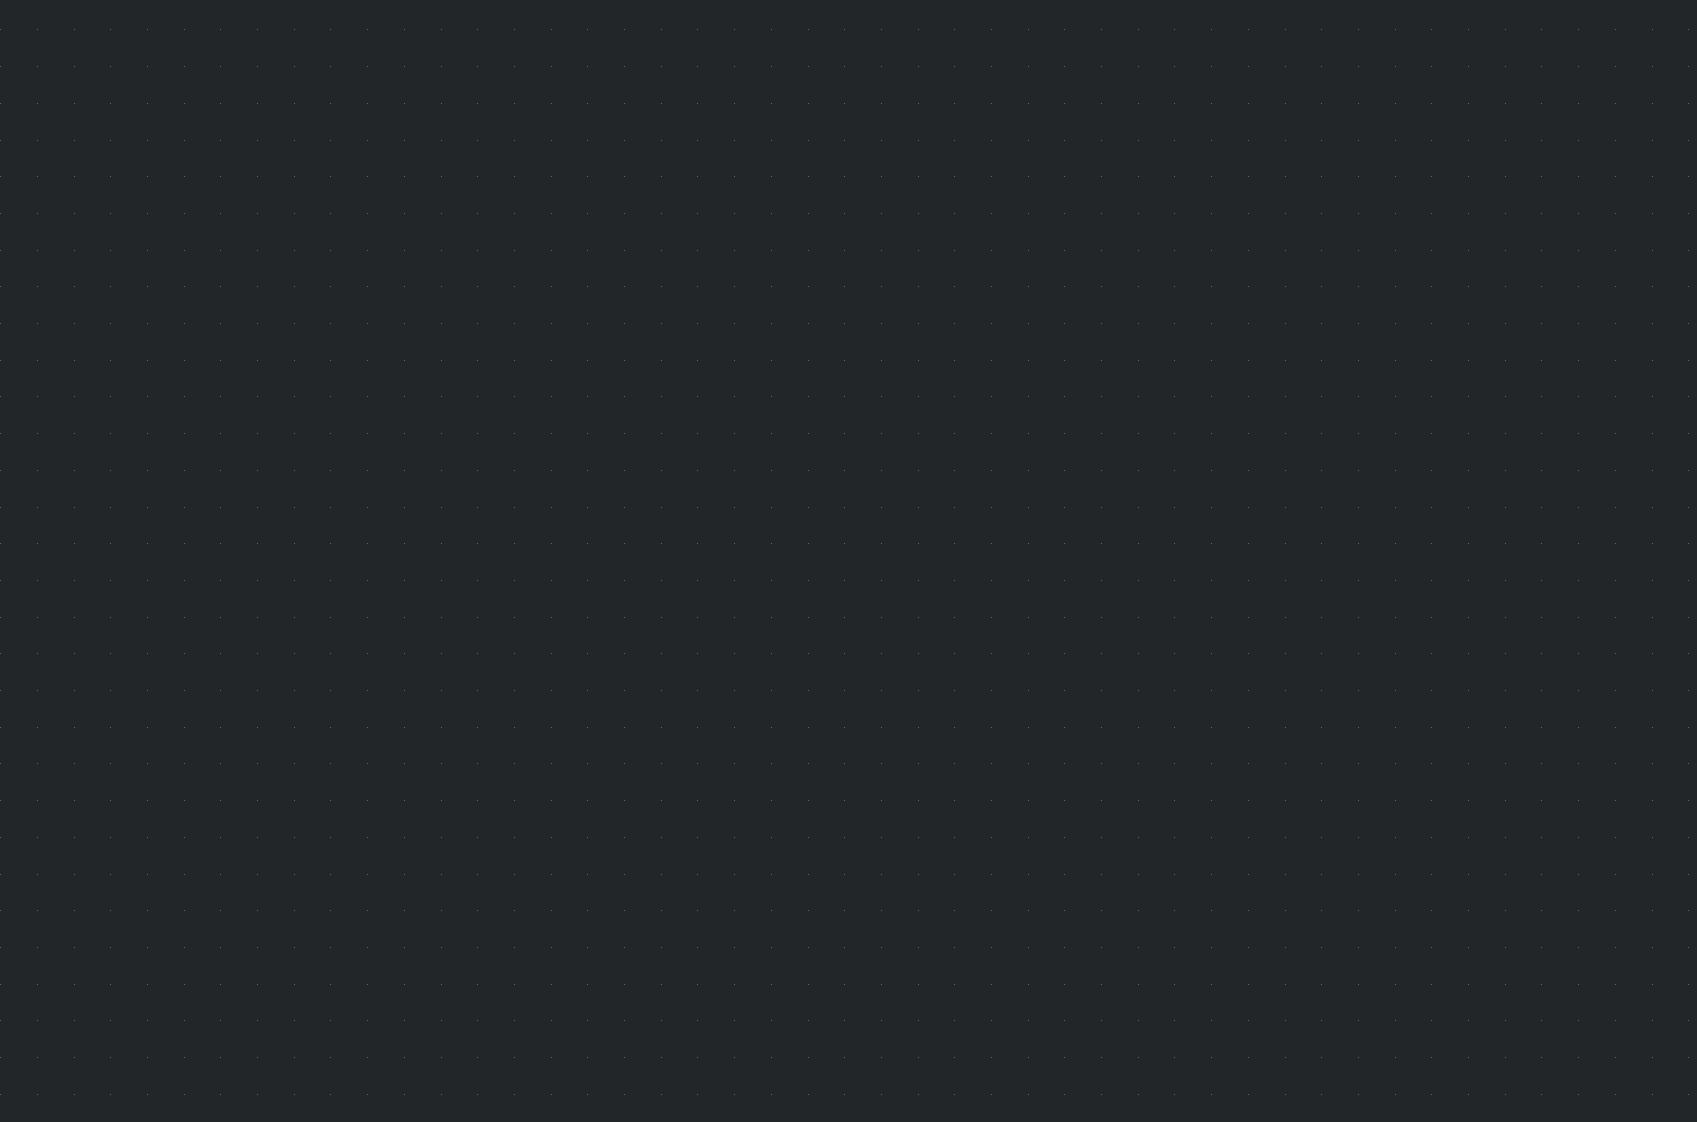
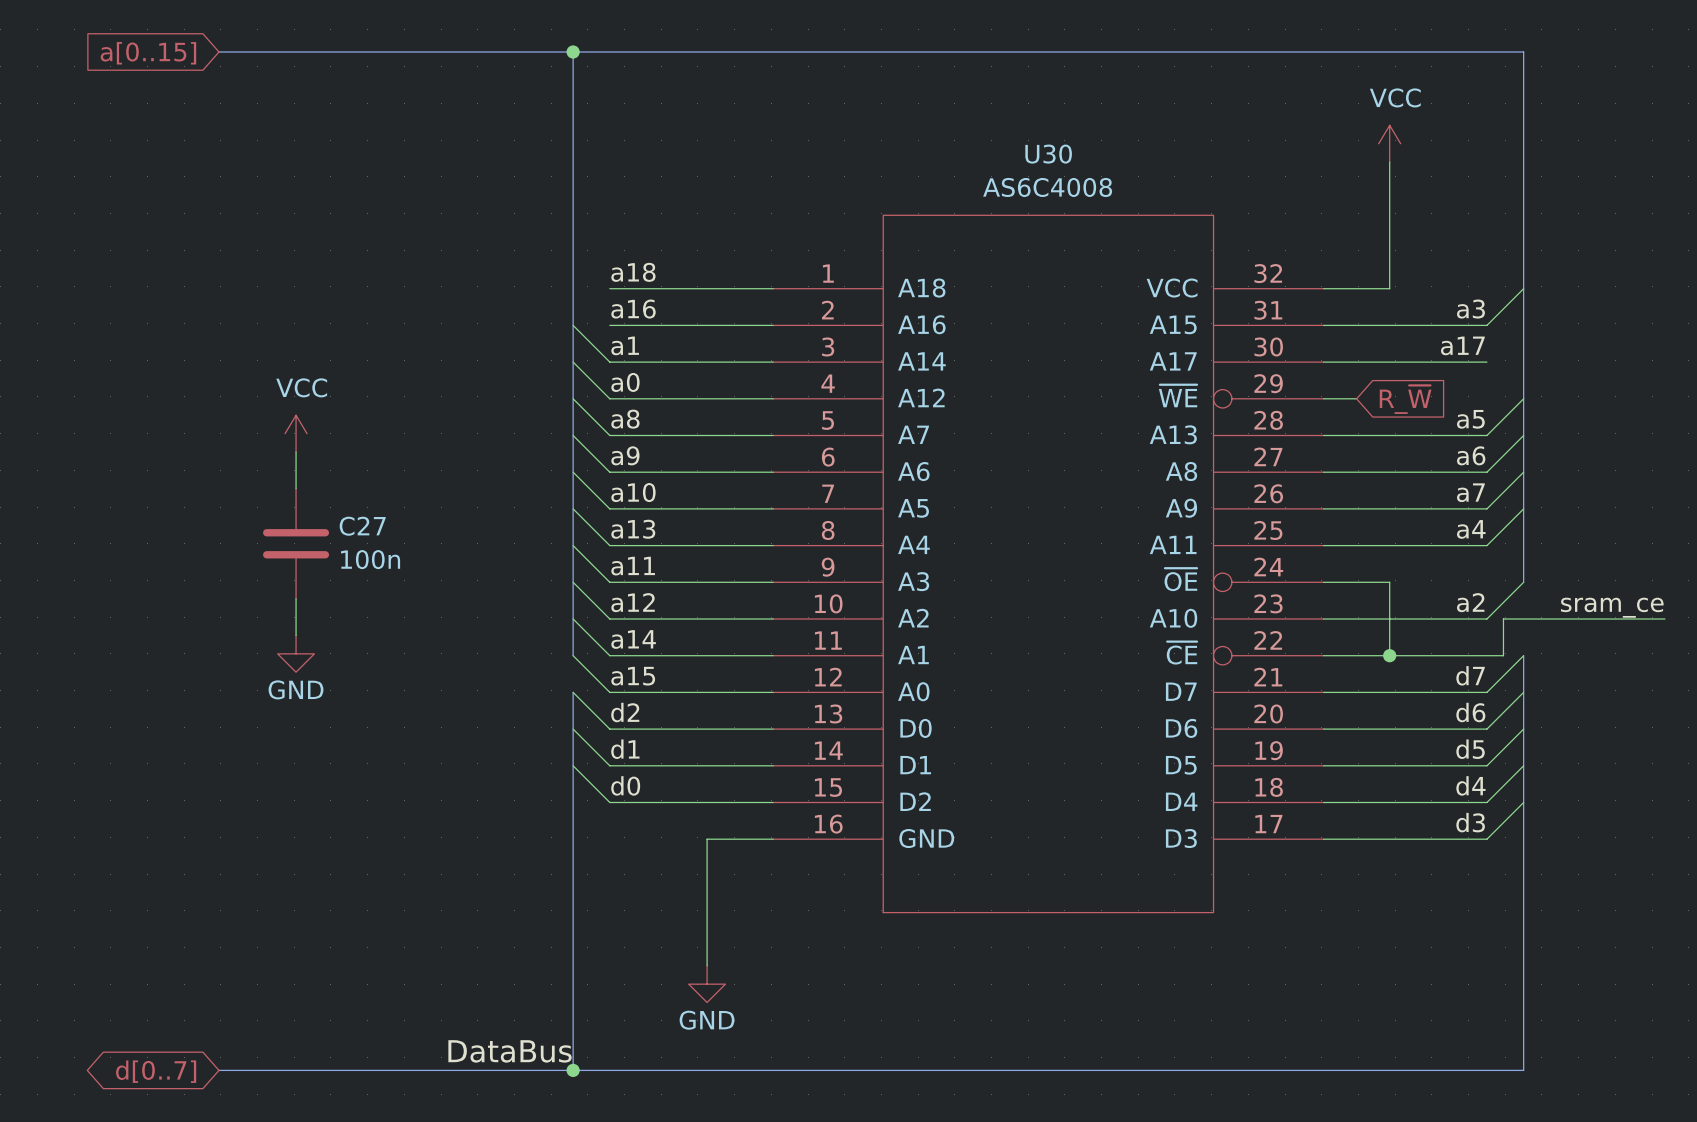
bus: none -> (218, 51) (1523, 51) (1523, 582)
bus: none -> (573, 51) (573, 655)
junction: none -> (573, 51)
global label: none -> a[0..15] (148, 53)
power symbol: none -> VCC (1389, 143)
wire: none -> (1389, 162) (1389, 288) (1323, 288)
label: none -> a18 (633, 272)
wire: none -> (609, 288) (773, 288)
wire: none -> (1523, 288) (1486, 325) (1323, 325)
label: none -> a16 (633, 309)
label: none -> a3 (1470, 309)
wire: none -> (573, 325) (609, 362) (773, 362)
wire: none -> (609, 325) (773, 325)
label: none -> a1 (625, 345)
label: none -> a17 (1462, 345)
wire: none -> (573, 362) (609, 398) (773, 398)
wire: none -> (1323, 362) (1486, 362)
label: none -> a0 (625, 382)
wire: none -> (573, 398) (609, 435) (773, 435)
wire: none -> (1323, 398) (1356, 398)
wire: none -> (1523, 398) (1486, 435) (1323, 435)
global label: none -> R_~{W} (1405, 399)
label: none -> a8 (625, 419)
label: none -> a5 (1470, 419)
power symbol: none -> VCC (296, 433)
wire: none -> (573, 435) (609, 472) (773, 472)
wire: none -> (1523, 435) (1486, 472) (1323, 472)
wire: none -> (296, 452) (296, 488)
label: none -> a9 (625, 455)
label: none -> a6 (1471, 455)
wire: none -> (573, 472) (609, 508) (773, 508)
wire: none -> (1523, 472) (1486, 508) (1323, 508)
label: none -> a10 (633, 492)
label: none -> a7 (1470, 492)
wire: none -> (573, 508) (609, 545) (773, 545)
wire: none -> (1523, 508) (1486, 545) (1323, 545)
label: none -> a13 (633, 529)
label: none -> a4 (1471, 529)
C27: none -> 100n (296, 543)
wire: none -> (573, 545) (609, 582) (773, 582)
U30: none -> AS6C4008 (1048, 563)
label: none -> a11 (633, 566)
wire: none -> (573, 582) (609, 619) (773, 619)
wire: none -> (1323, 582) (1389, 582) (1389, 655)
wire: none -> (1523, 582) (1486, 619) (1323, 619)
wire: none -> (296, 598) (296, 635)
label: none -> a12 (633, 602)
label: none -> a2 (1470, 602)
label: none -> sram_ce (1612, 607)
wire: none -> (573, 619) (609, 655) (773, 655)
wire: none -> (1664, 619) (1503, 619) (1503, 655) (1323, 655)
label: none -> a14 (633, 639)
power symbol: none -> GND (296, 653)
wire: none -> (573, 655) (609, 692) (773, 692)
junction: none -> (1389, 655)
wire: none -> (1523, 655) (1486, 692) (1323, 692)
bus: none -> (1523, 655) (1523, 1070) (218, 1070)
label: none -> d7 (1470, 675)
label: none -> a15 (633, 676)
wire: none -> (573, 692) (609, 729) (773, 729)
bus: none -> (573, 692) (573, 1070)
wire: none -> (1523, 692) (1486, 729) (1323, 729)
label: none -> d2 (625, 712)
label: none -> d6 (1470, 712)
wire: none -> (573, 729) (609, 765) (773, 765)
wire: none -> (1523, 729) (1486, 765) (1323, 765)
label: none -> d1 (625, 749)
label: none -> d5 (1470, 749)
wire: none -> (573, 765) (609, 802) (773, 802)
wire: none -> (1523, 765) (1486, 802) (1323, 802)
label: none -> d0 (625, 785)
label: none -> d4 (1470, 785)
wire: none -> (1523, 802) (1486, 839) (1323, 839)
label: none -> d3 (1470, 822)
wire: none -> (773, 839) (707, 839) (707, 965)
power symbol: none -> GND (707, 984)
label: none -> DataBus (510, 1051)
junction: none -> (573, 1070)
global label: none -> d[0..7] (156, 1071)

